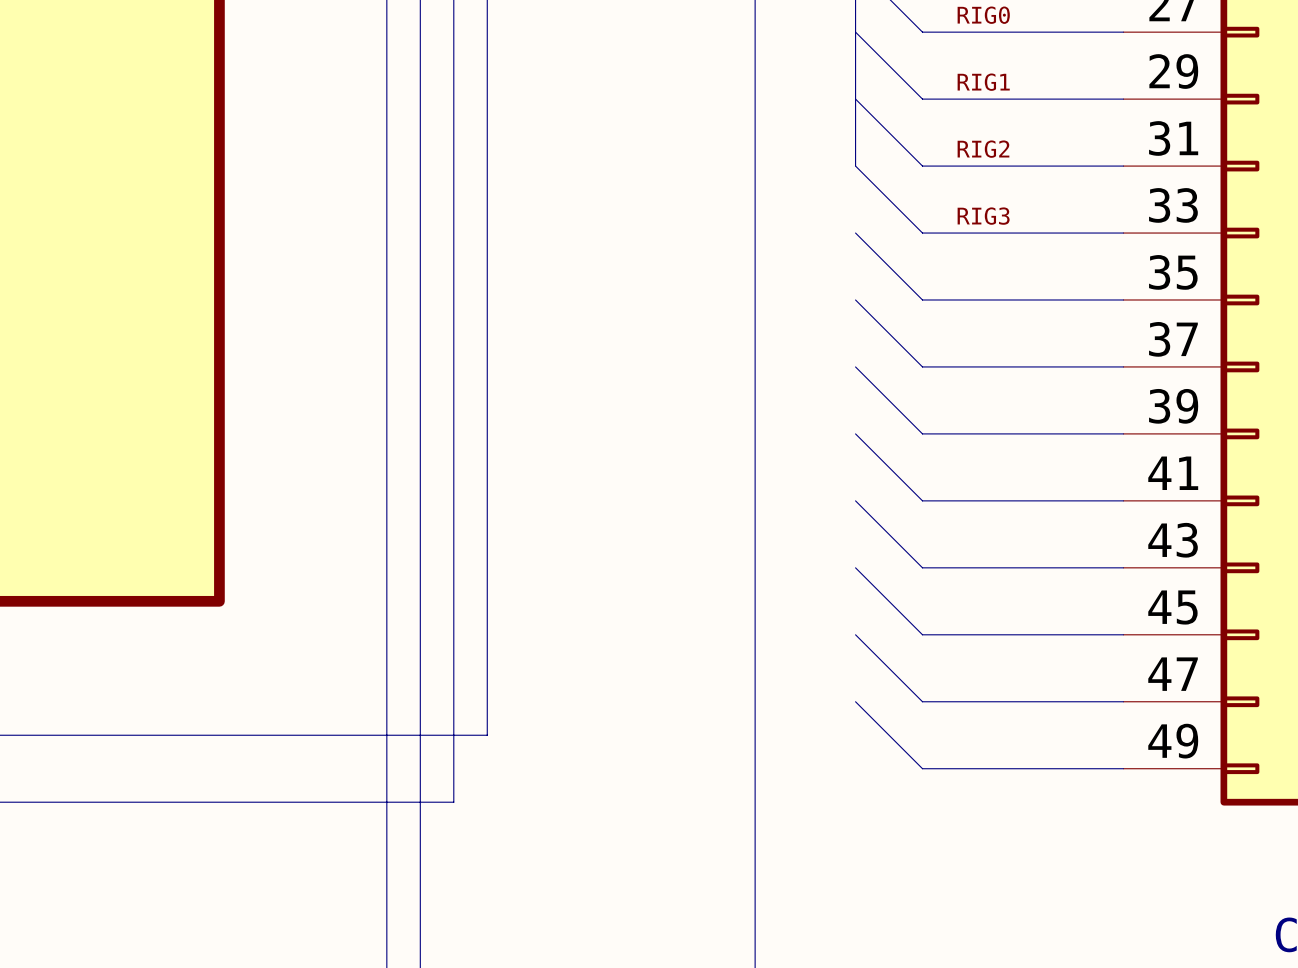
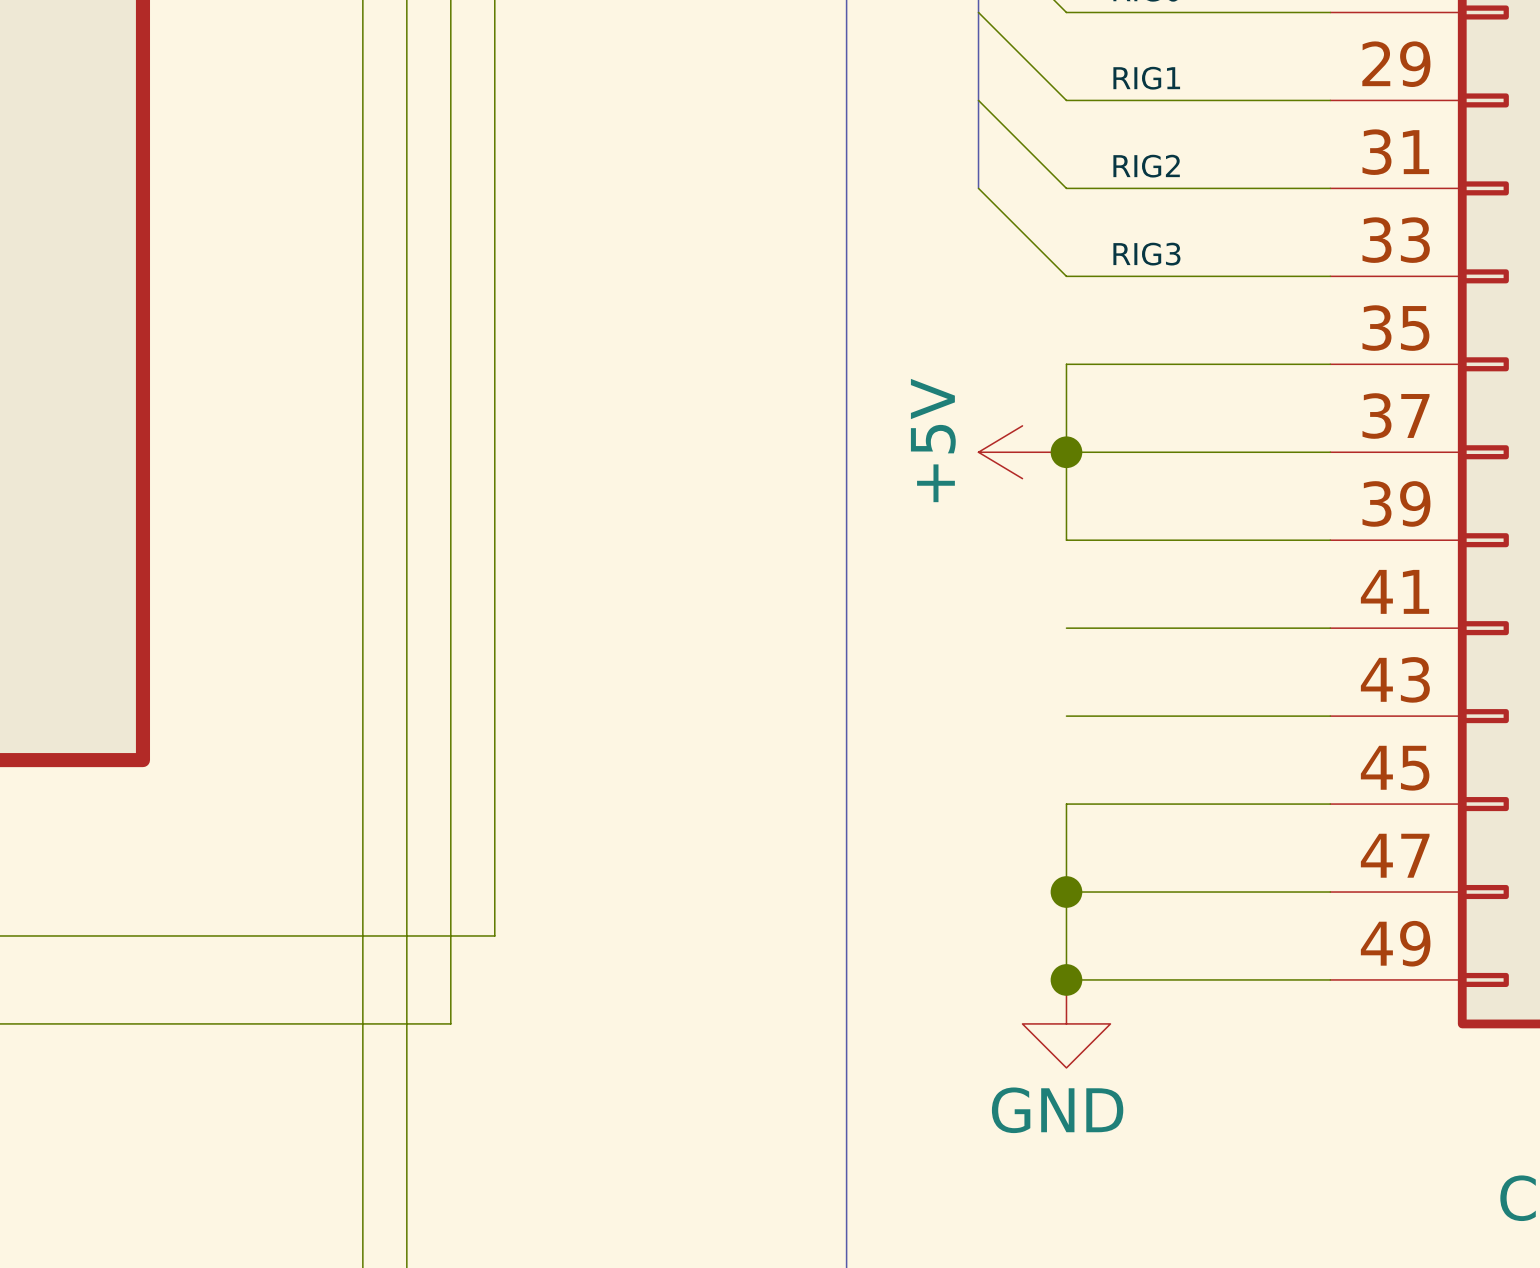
wire: (855, 233) (922, 299) -> none
wire: (855, 299) (922, 366) -> none
wire: (855, 366) (922, 433) -> (1066, 364) (1066, 540)
power symbol: none -> +5V (1022, 452)
junction: none -> (1066, 452)
wire: (855, 433) (922, 500) -> none
wire: (855, 500) (922, 567) -> none
wire: (855, 567) (922, 634) -> none
wire: (855, 634) (922, 701) -> none
wire: (855, 701) (922, 768) -> (1066, 804) (1066, 979)
junction: none -> (1066, 892)
junction: none -> (1066, 979)
power symbol: none -> GND (1066, 1023)

